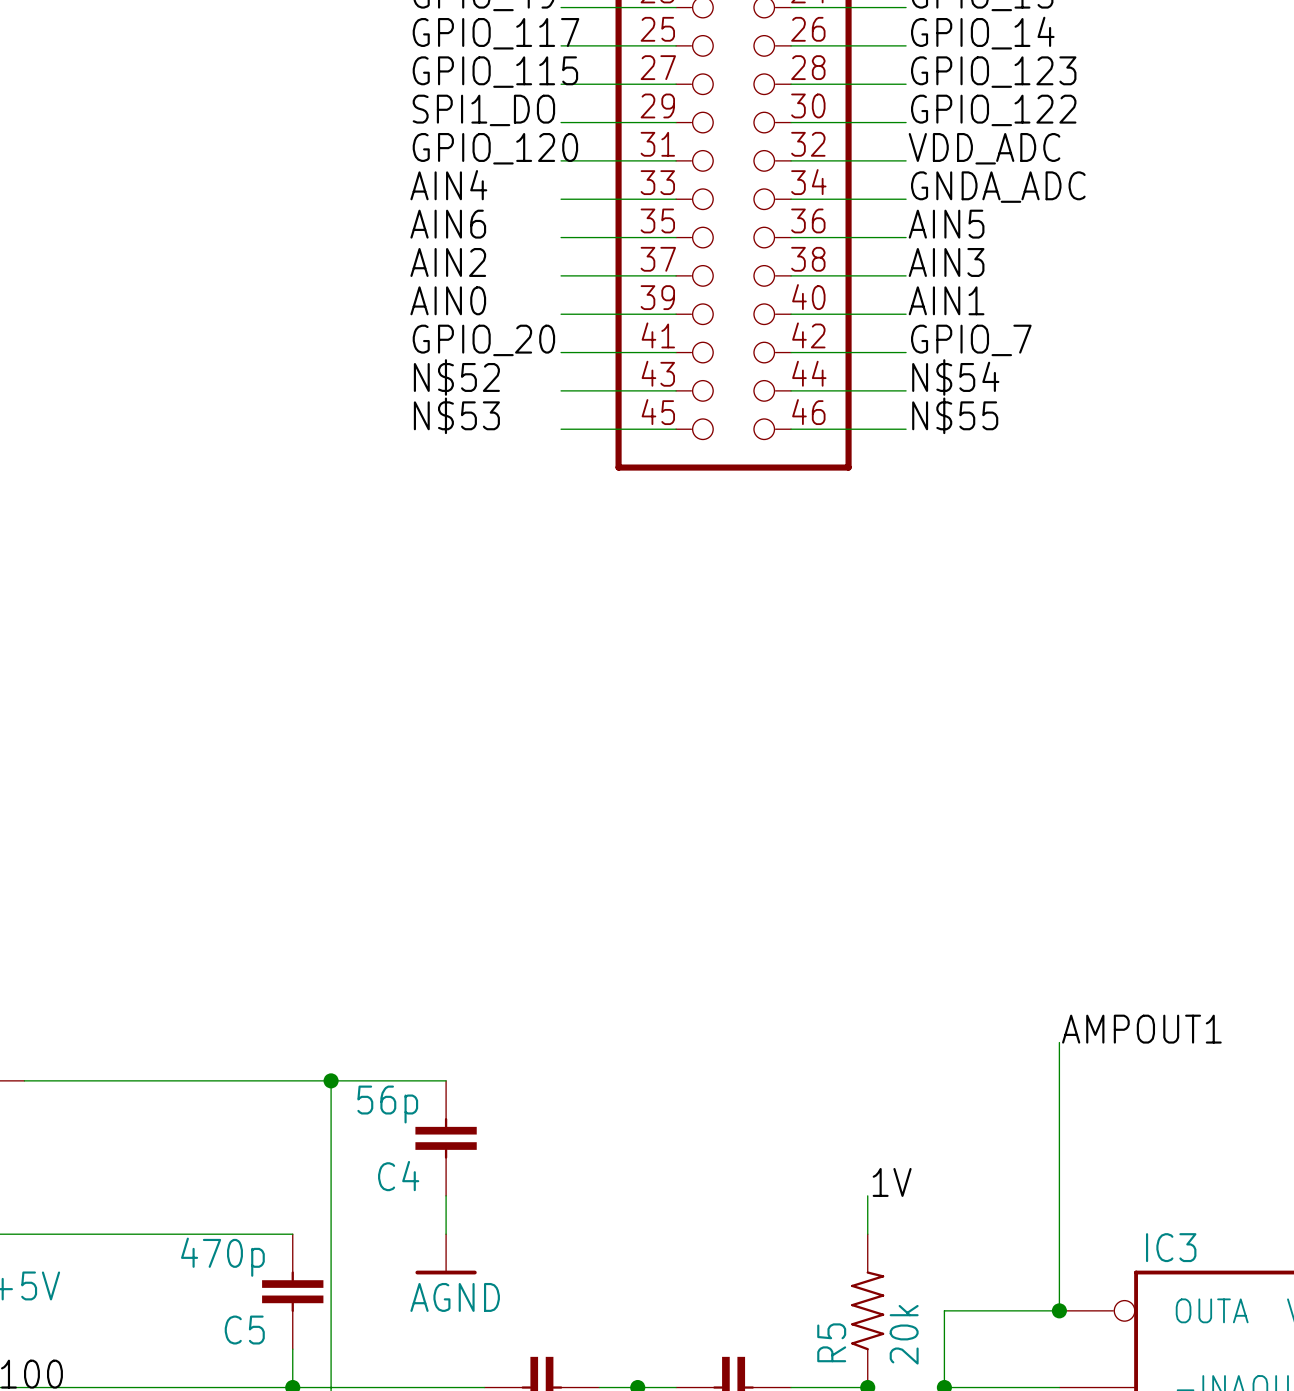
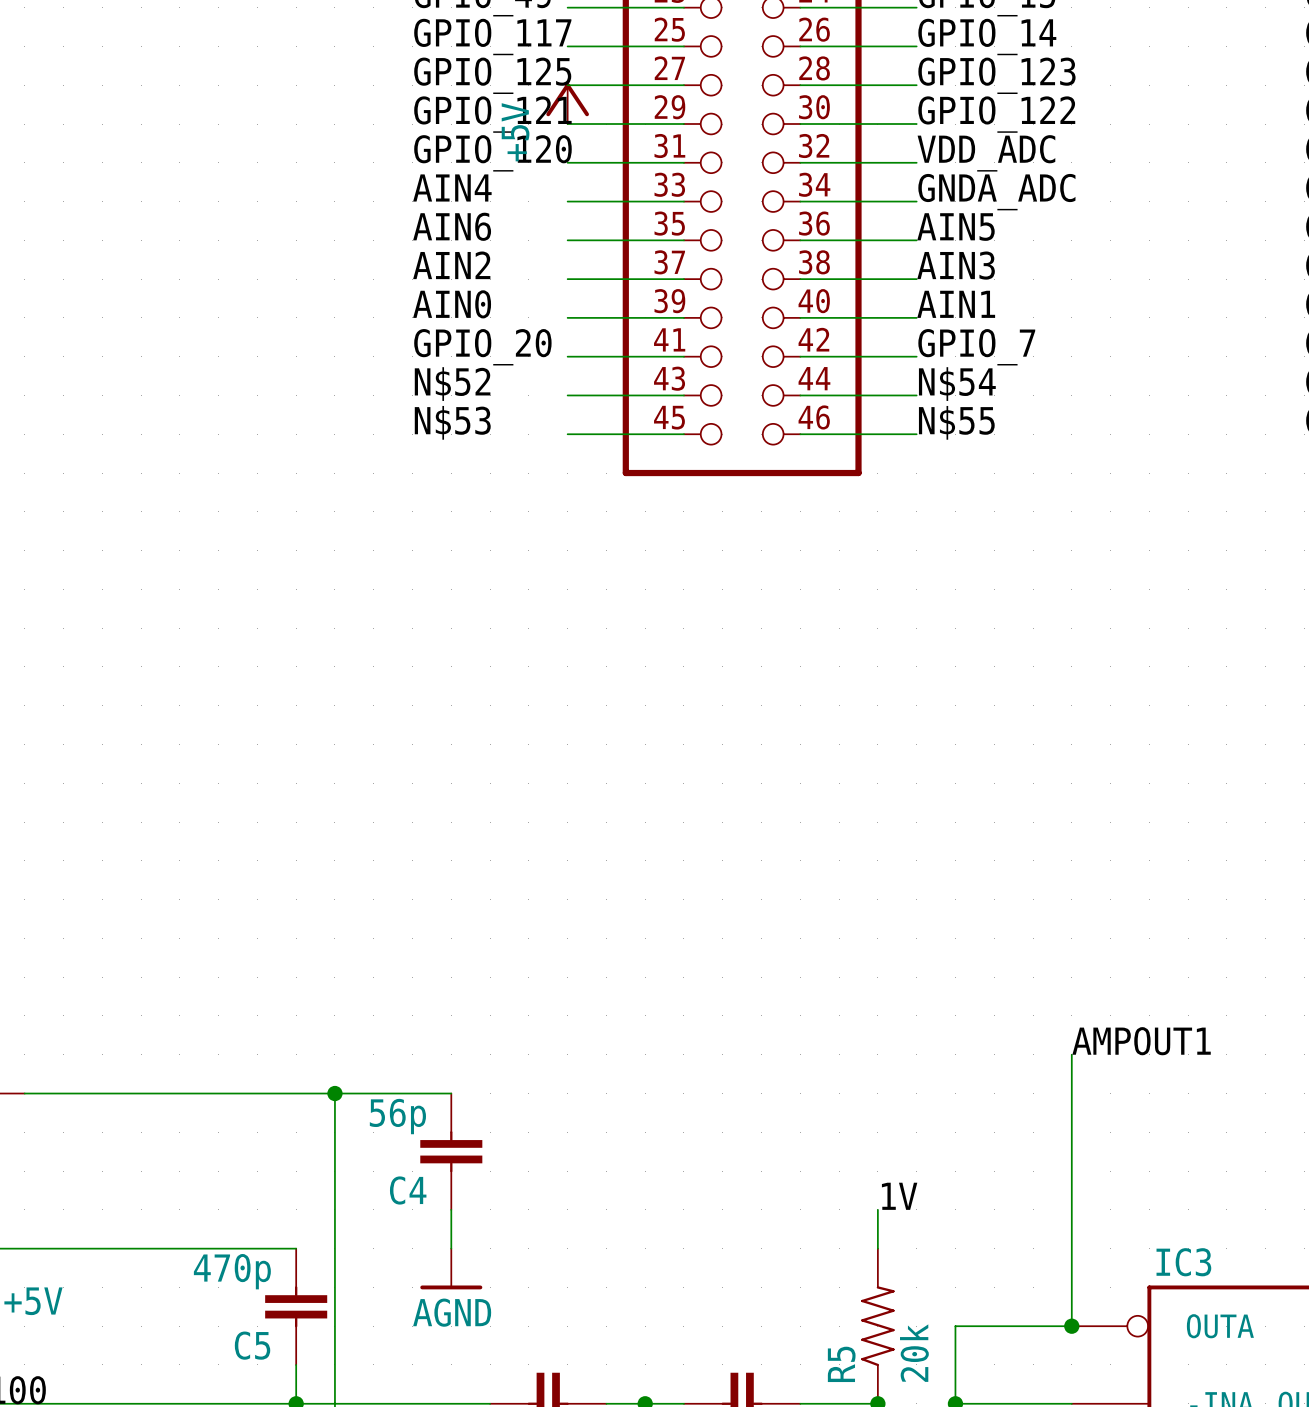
label: GPIO_115 (495, 72) -> GPIO_125 (492, 75)
power symbol: none -> +5V (567, 103)
label: SPI1_DO (483, 110) -> GPIO_121 (492, 114)

